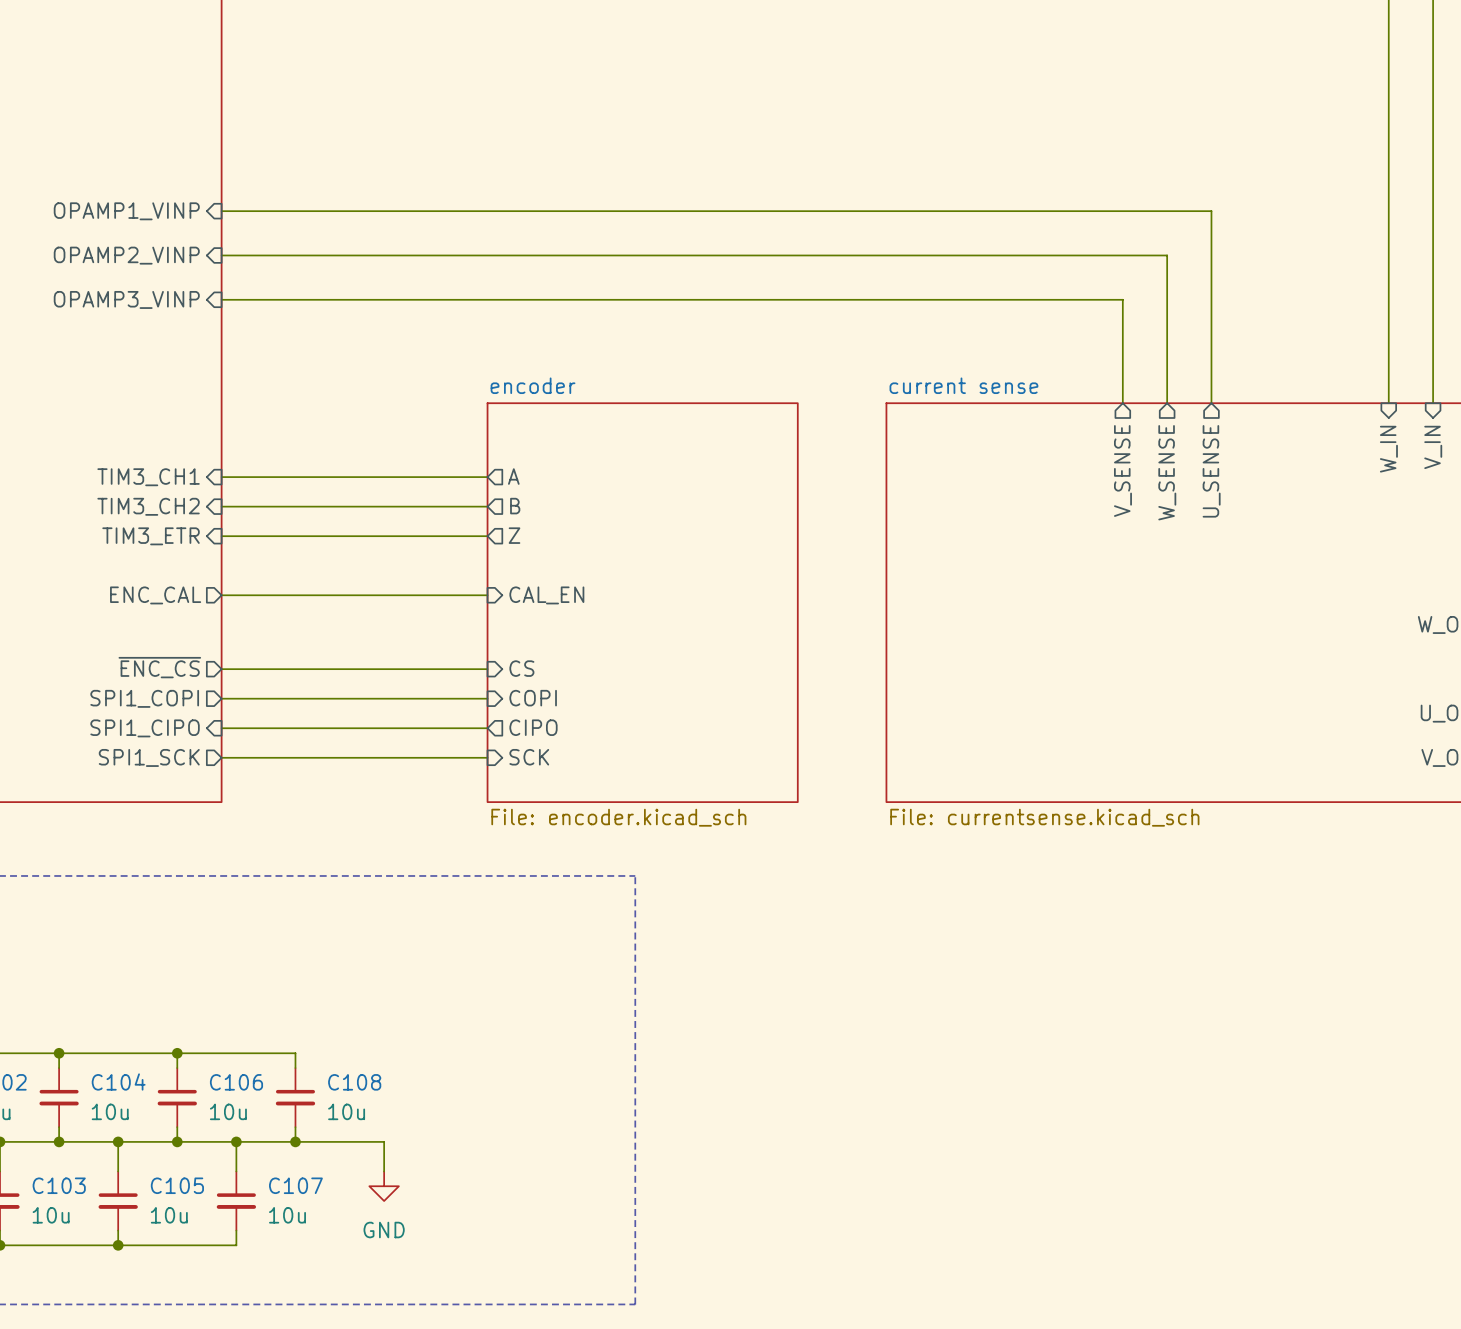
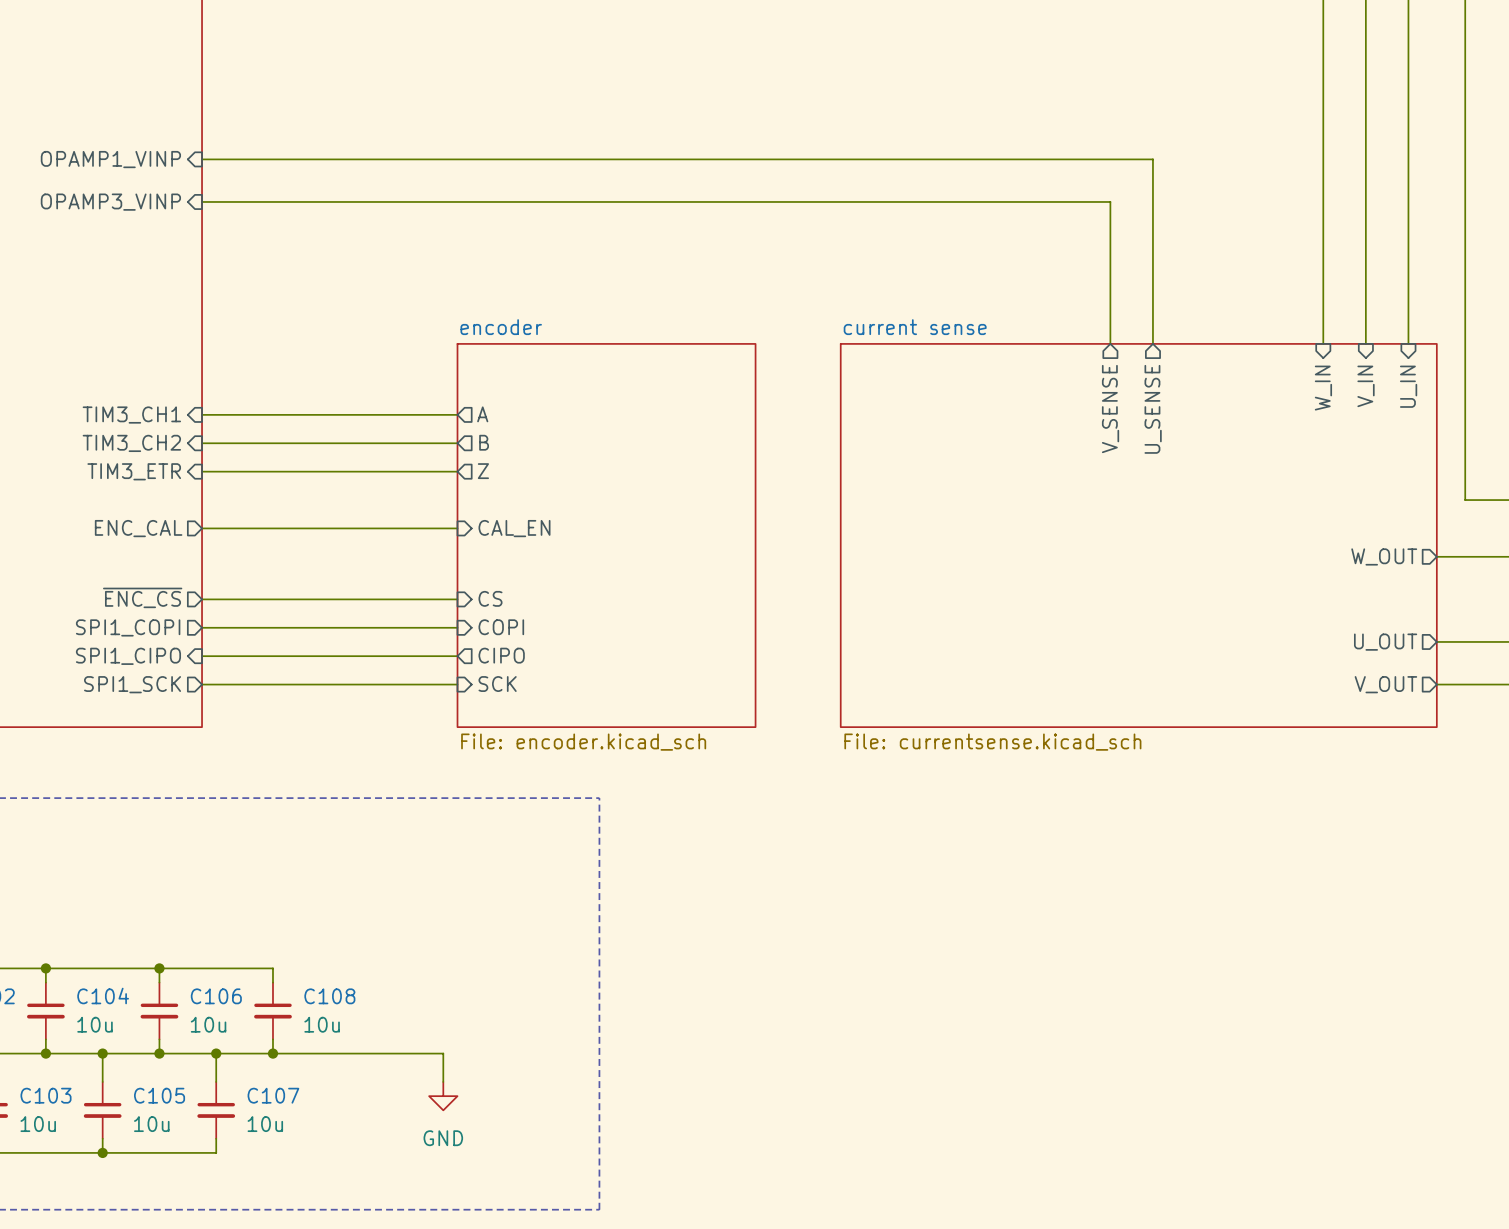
sheet pin: OPAMP2_VINP (126, 255) -> OPAMP3_VINP (110, 202)
sheet pin: OPAMP3_VINP (126, 299) -> none
wire: (221, 299) (1122, 299) (1122, 403) -> none
sheet pin: V_SENSE (1122, 470) -> none
sheet pin: W_SENSE (1167, 472) -> V_SENSE (1110, 409)
wire: (384, 1141) (384, 1171) -> (358, 1053) (443, 1053) (443, 1081)
power symbol position: GND (384, 1186) -> GND (443, 1096)

